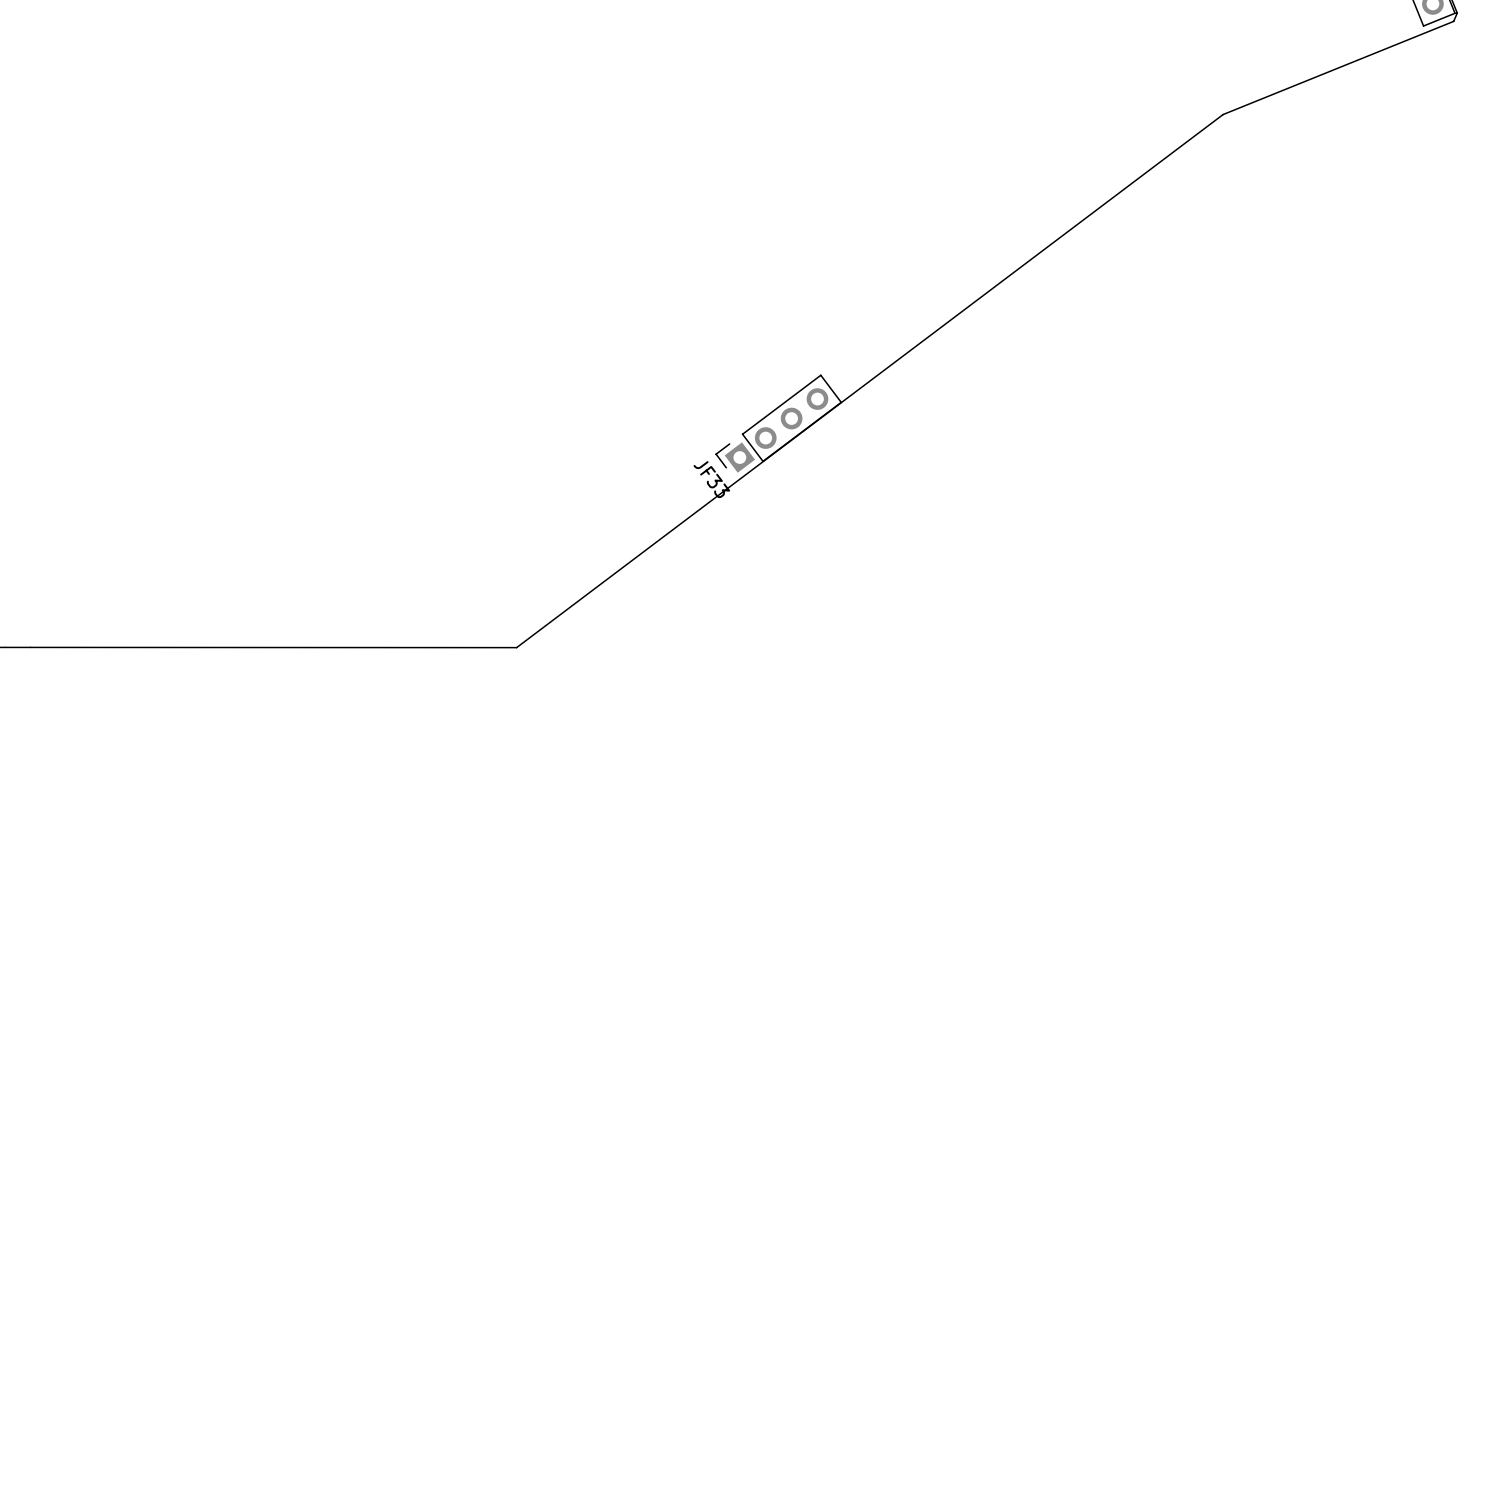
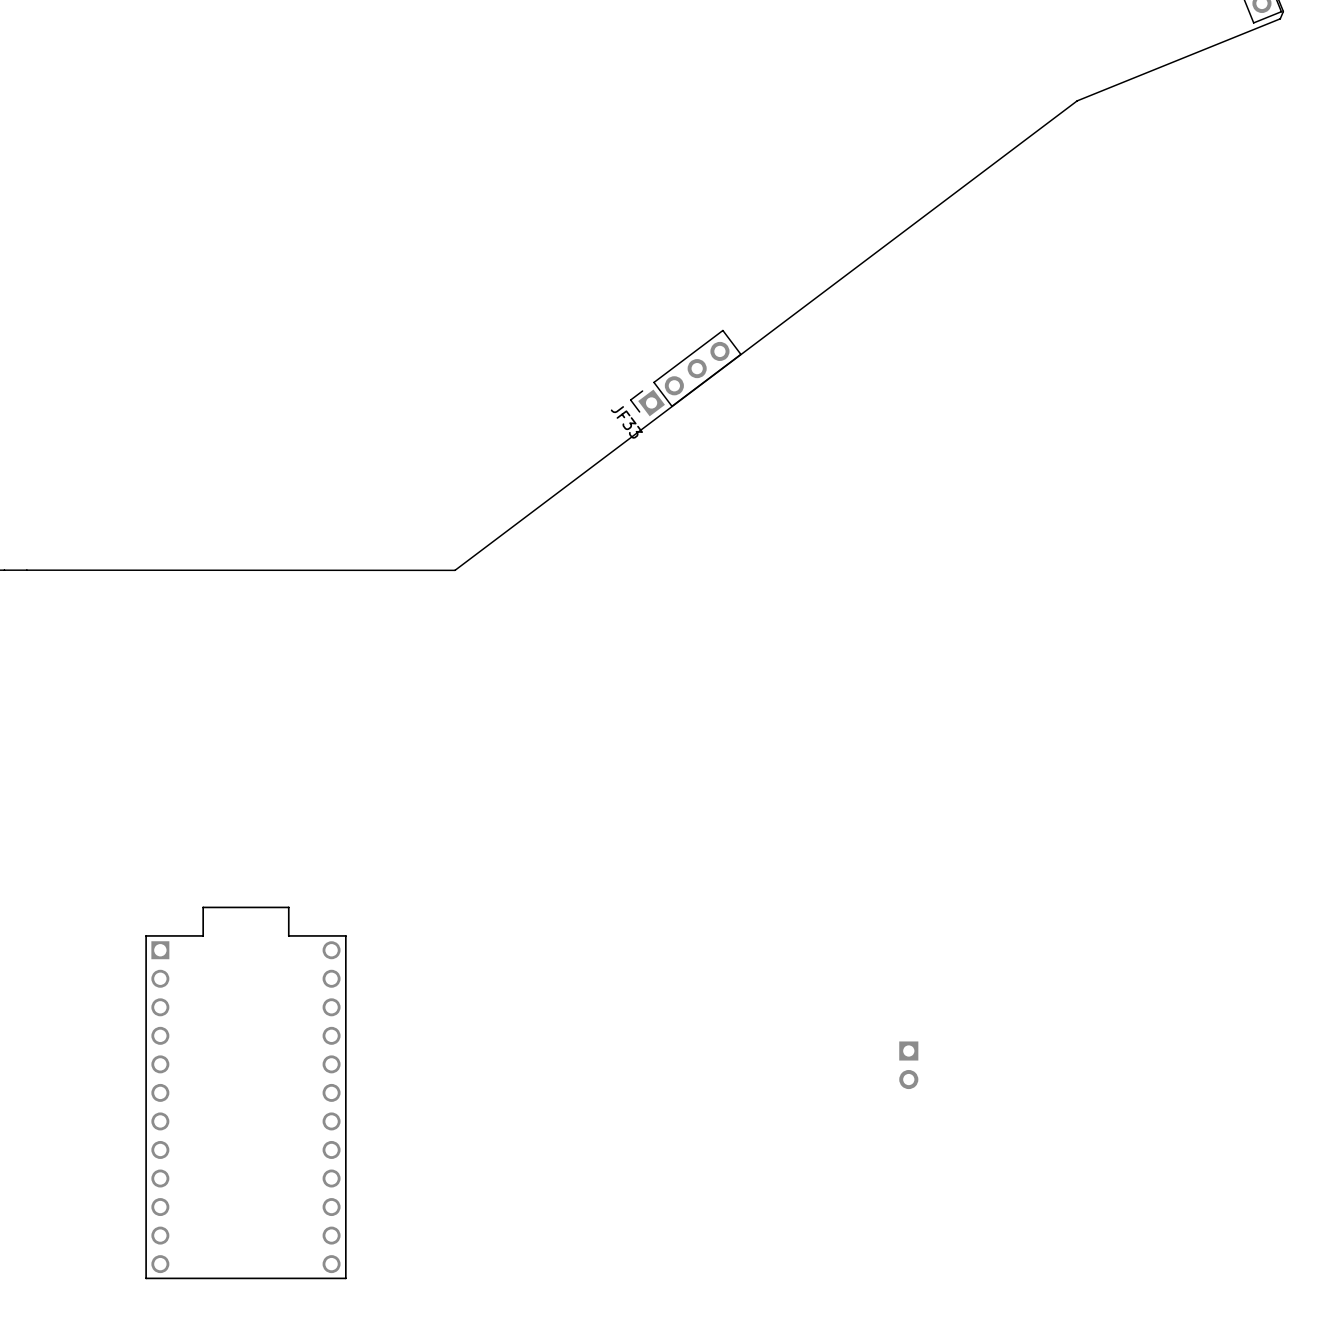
part: none -> (908, 1065)
part: none -> (245, 1092)

